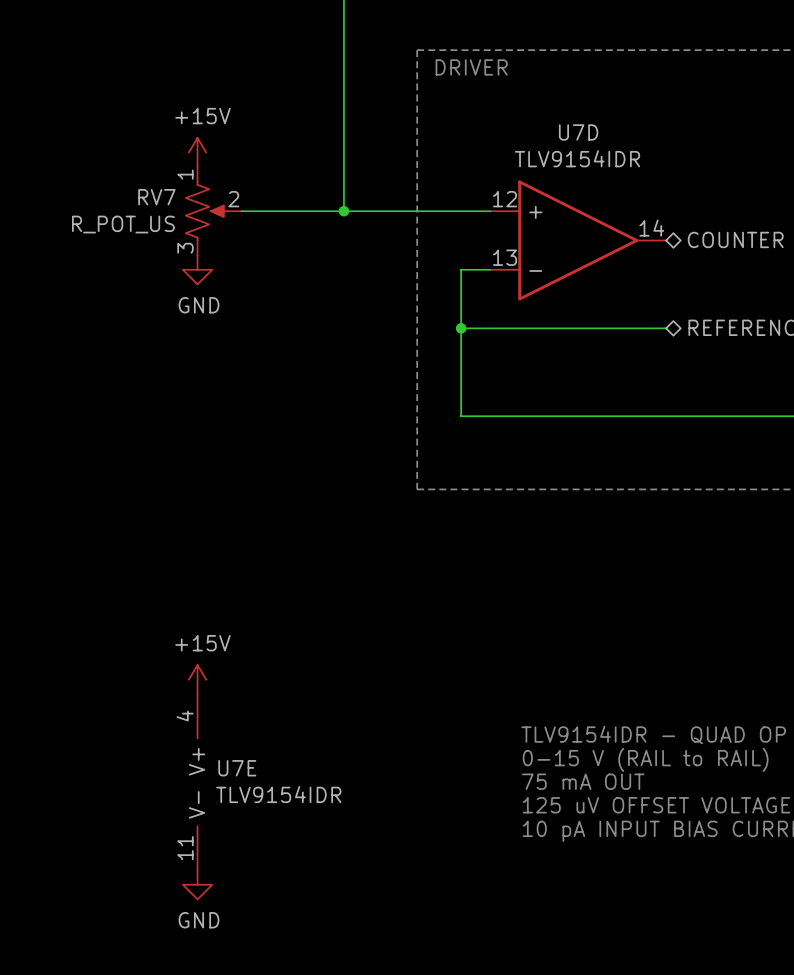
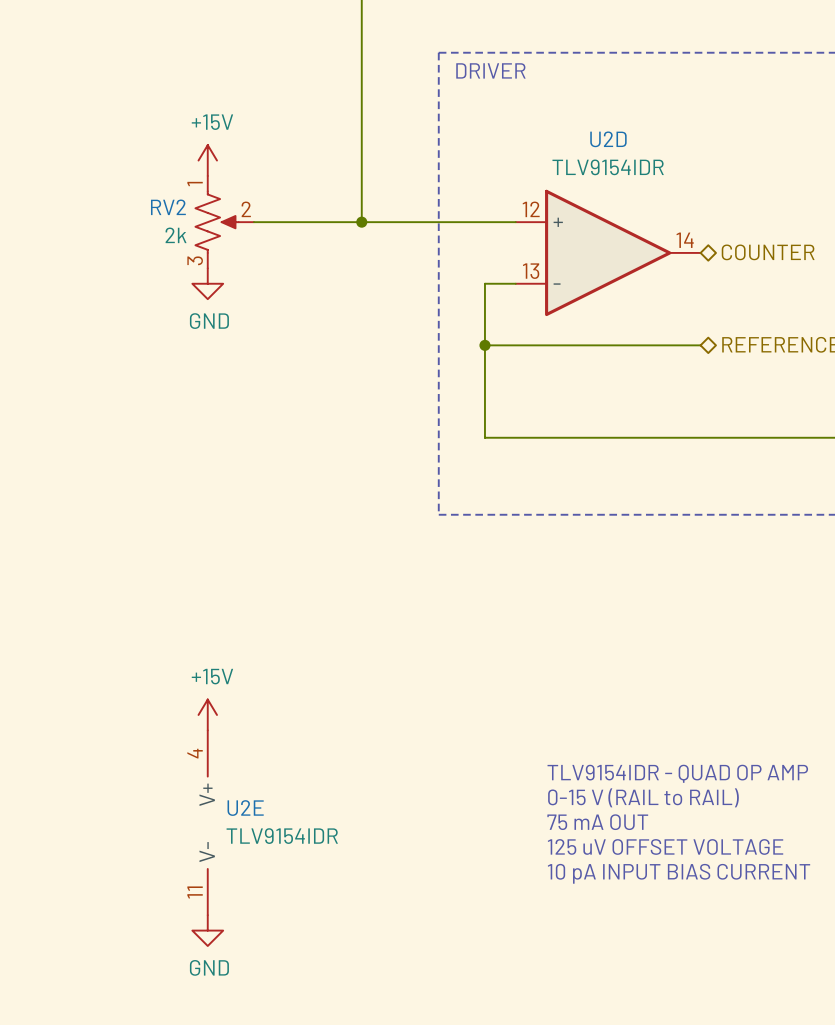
U7D name: U7D (578, 132) -> U2D (608, 139)
RV7 name: RV7 (156, 197) -> RV2 (168, 207)
RV7 value: R_POT_US (123, 224) -> 2k (176, 235)
U7E name: U7E (237, 768) -> U2E (245, 808)

